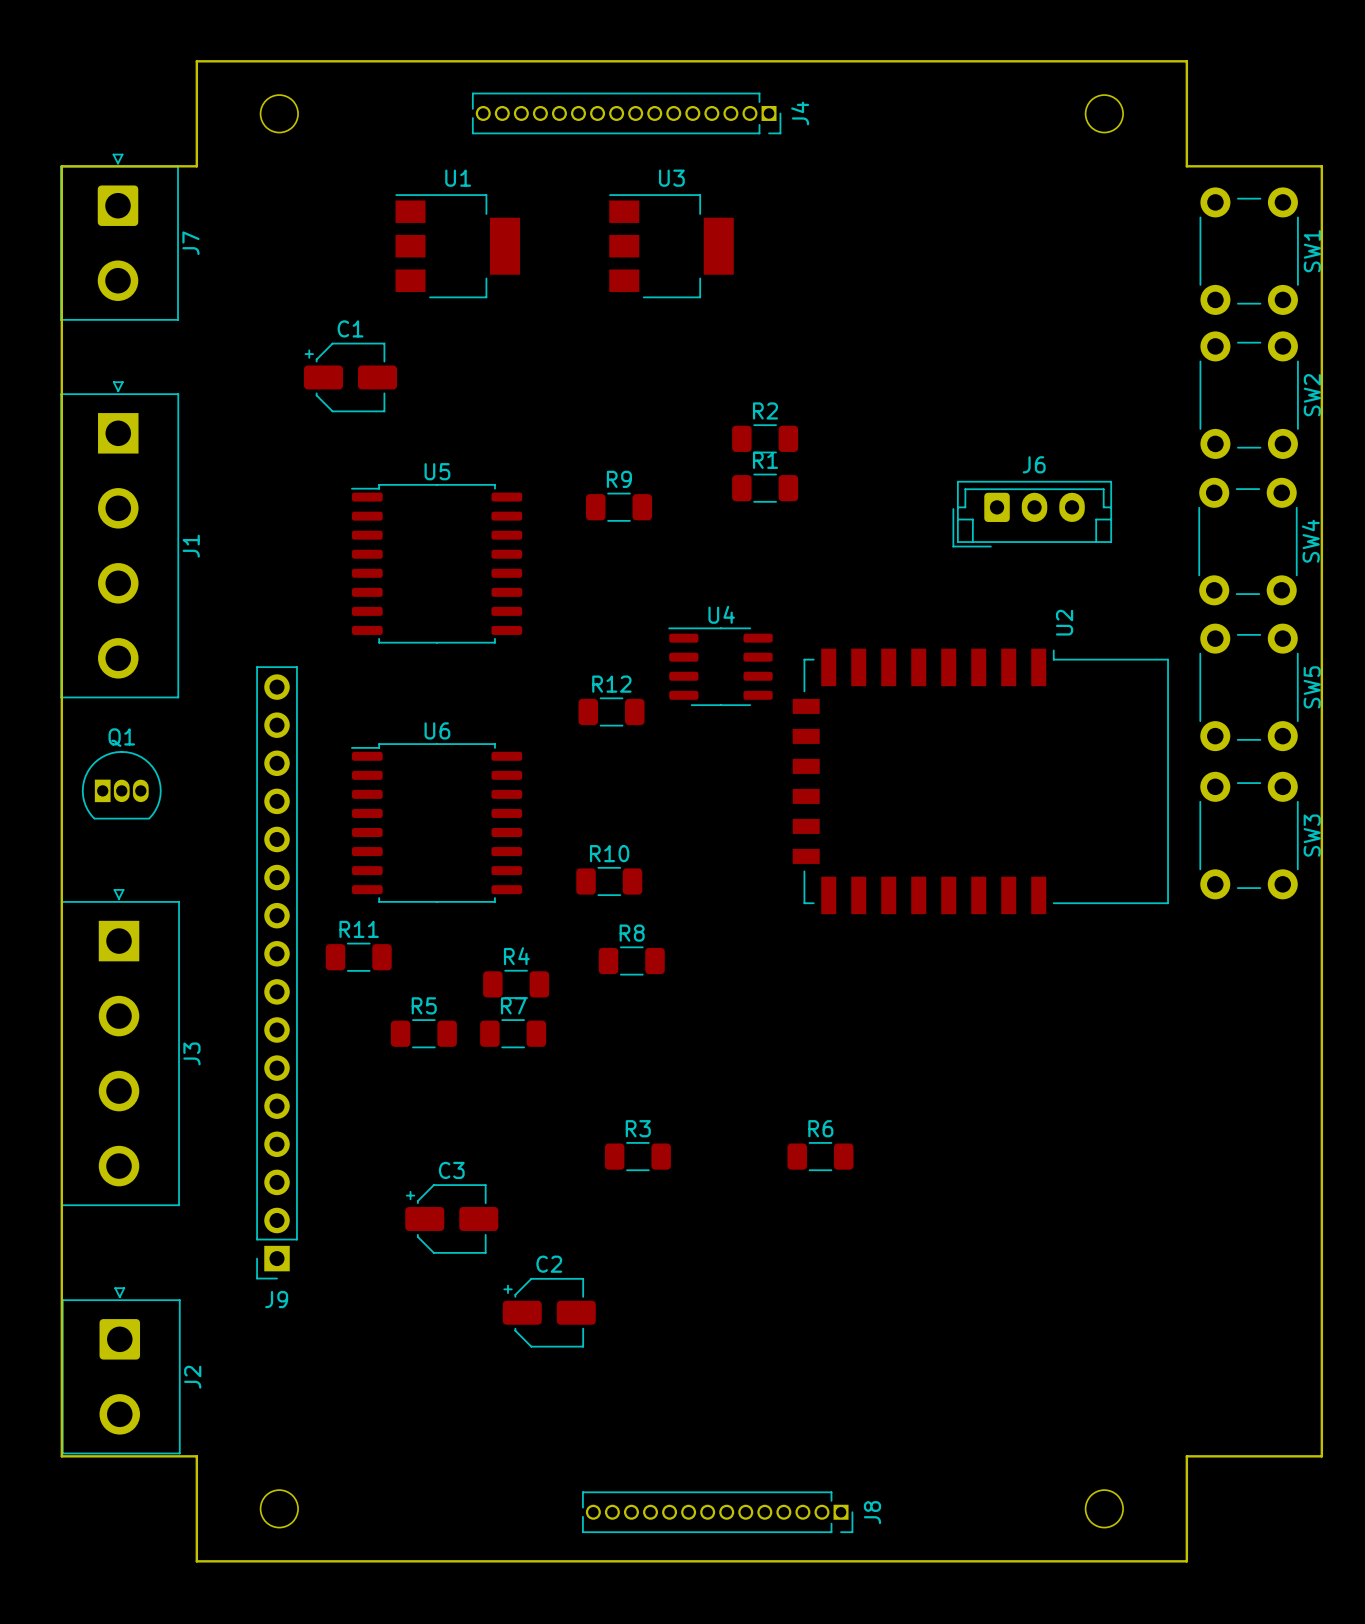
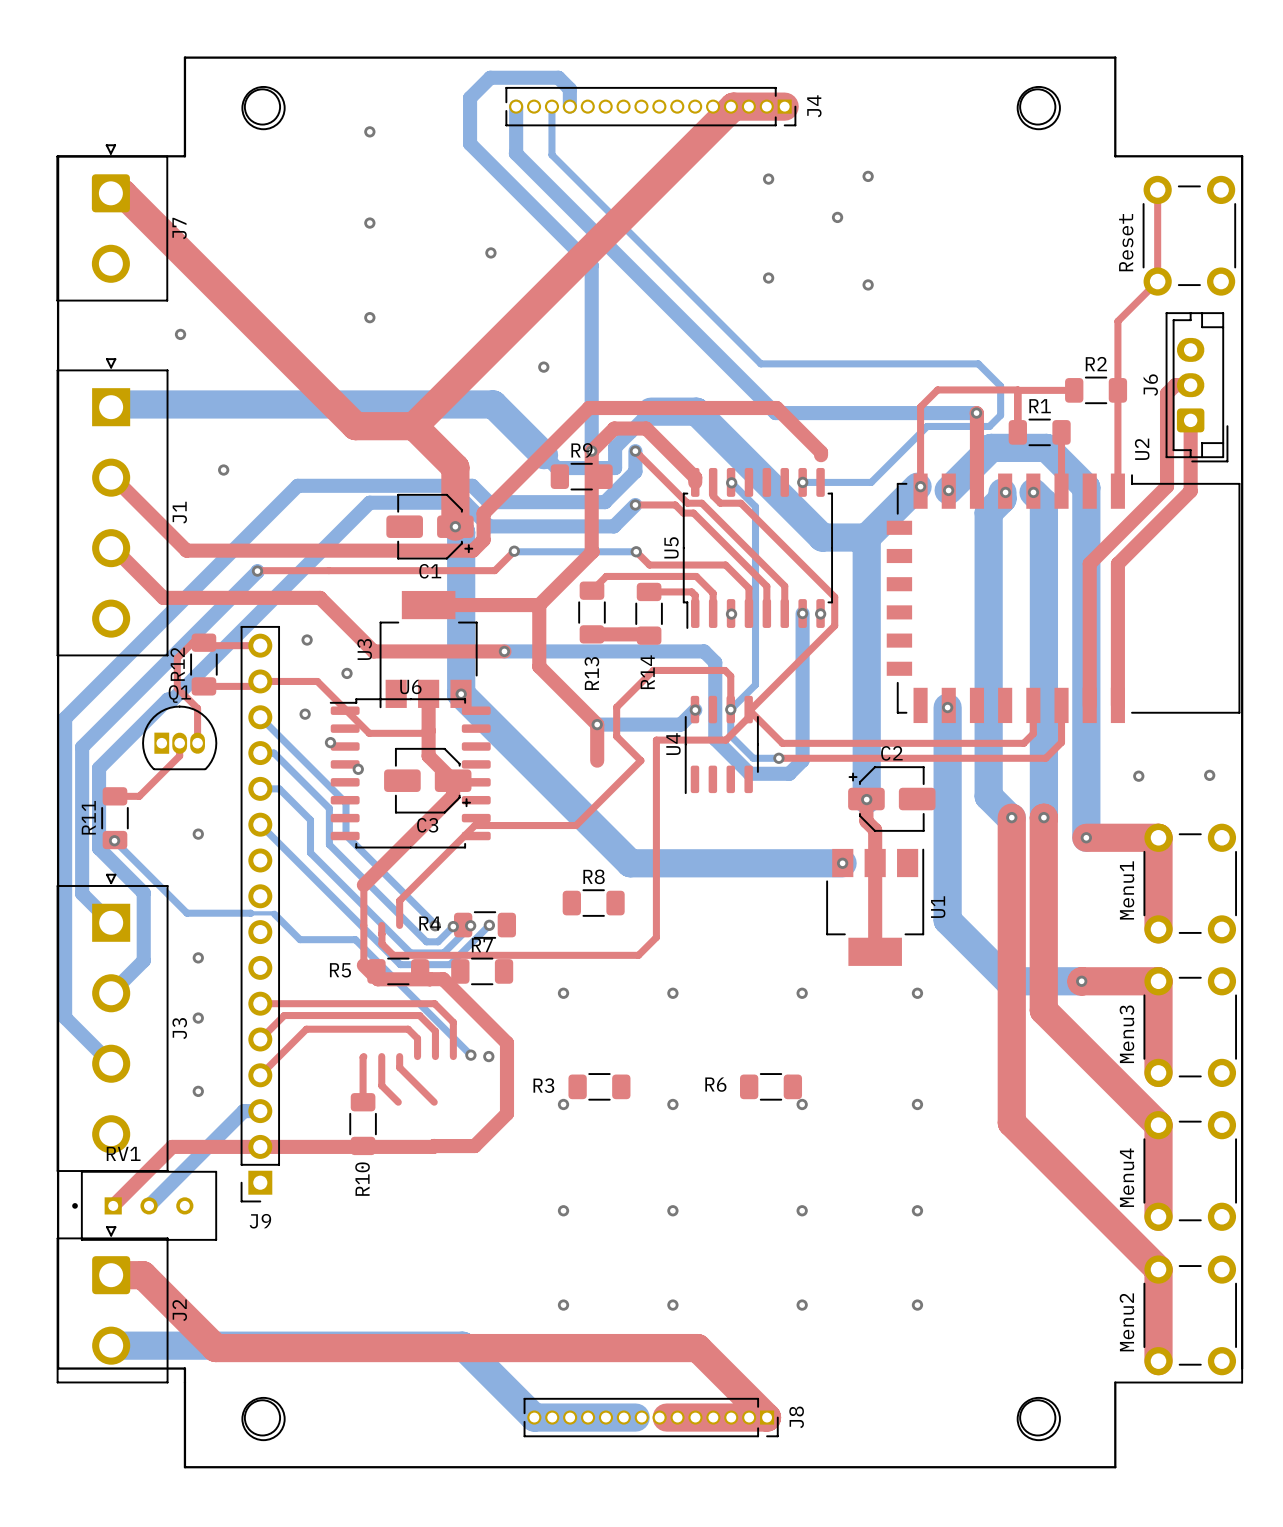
round board edge: none -> [242, 86, 285, 130]
round board edge: none -> [1017, 86, 1060, 130]
bottom track: none -> (516, 106) (515, 153) (775, 413) (976, 413)
bottom track: none -> (551, 106) (551, 154) (760, 363) (978, 363) (1000, 386) (1000, 415) (989, 426) (927, 426) (871, 482) (802, 482)
bottom track: none -> (569, 106) (569, 89) (558, 77) (490, 77) (470, 98) (470, 143) (591, 265) (591, 451)
J4 position: (626, 113) -> (650, 106)
top track: none -> (784, 106) (733, 106) (413, 426)
via: none -> (369, 131)
via: none -> (868, 176)
via: none -> (768, 179)
top track: none -> (1157, 189) (1157, 281) (1117, 321) (1117, 491)
top track: none -> (110, 193) (122, 193) (355, 426) (413, 426)
via: none -> (837, 217)
via: none -> (369, 223)
U1 rotation: 0° (457, 246) -> 90° clockwise (875, 907)
U1 position: (457, 246) -> (875, 907)
U3 rotation: 0° (671, 246) -> 90° counterclockwise (428, 649)
U3 position: (671, 246) -> (428, 649)
part: none -> Reset (1189, 235)
SW1: (1249, 251) -> none
via: none -> (490, 252)
via: none -> (768, 278)
via: none -> (868, 284)
via: none -> (369, 317)
via: none -> (180, 334)
C1 rotation: 0° (350, 377) -> 180° (430, 526)
C1 position: (350, 377) -> (430, 526)
via: none -> (543, 367)
SW2: (1249, 395) -> none
top track: none -> (1190, 385) (1175, 385) (1167, 393) (1167, 486) (1089, 563) (1089, 705)
top track: none -> (1017, 390) (1074, 390)
bottom track: none -> (110, 404) (493, 404) (556, 468) (615, 468) (615, 447) (650, 411) (696, 411) (822, 537) (866, 537)
R2 position: (765, 438) -> (1096, 390)
top track: none -> (976, 413) (976, 491)
via: none -> (976, 413)
top track: none -> (1190, 420) (1190, 491) (1117, 563) (1117, 705)
top track: none -> (413, 426) (455, 467) (455, 526)
top track: none -> (1017, 432) (1017, 389) (937, 389) (920, 407) (920, 491)
top track: none -> (1061, 432) (1061, 491)
via: none -> (591, 451)
top track: none -> (635, 451) (687, 503) (701, 503) (784, 586) (784, 613)
bottom track: none -> (635, 451) (635, 471) (604, 502) (488, 502) (472, 485) (297, 485) (65, 718) (65, 1017) (111, 1063)
via: none -> (635, 451)
top track: none -> (821, 455) (821, 452) (776, 408) (588, 408) (483, 513) (483, 539) (472, 550) (186, 550) (110, 474)
R1 position: (765, 488) -> (1039, 432)
via: none -> (223, 470)
top track: none -> (695, 482) (695, 477) (646, 428) (614, 428) (591, 451) (592, 551) (539, 605)
top track: none -> (713, 482) (713, 496) (720, 503) (740, 503) (834, 597) (834, 625) (750, 709) (748, 709)
bottom track: none -> (731, 482) (755, 506) (755, 684) (730, 709) (730, 735) (753, 758) (778, 758)
via: none -> (731, 482)
via: none -> (802, 482)
J6 rotation: 0° (1032, 514) -> 90° counterclockwise (1196, 387)
J6 position: (1032, 514) -> (1196, 387)
bottom track: none -> (917, 486) (866, 537)
via: none -> (920, 486)
bottom track: none -> (948, 490) (991, 447) (1046, 447) (1086, 487) (1086, 837)
via: none -> (948, 490)
bottom track: none -> (1002, 492) (1002, 498) (988, 512) (988, 796) (1011, 817)
via: none -> (1005, 492)
bottom track: none -> (1033, 492) (1043, 502) (1043, 817)
via: none -> (1033, 492)
top track: none -> (635, 504) (675, 504) (683, 513) (693, 513) (766, 586) (766, 613)
bottom track: none -> (635, 504) (613, 526) (489, 526) (465, 502) (369, 502) (172, 699) (167, 699) (99, 768) (99, 848) (143, 893) (143, 960) (111, 993)
via: none -> (635, 504)
SW4: (1247, 541) -> none
bottom track: none -> (455, 526) (461, 532) (461, 694) (630, 863) (842, 863)
via: none -> (455, 526)
U5 rotation: 0° (436, 563) -> 90° counterclockwise (757, 548)
U5 position: (436, 563) -> (757, 548)
bottom track: none -> (866, 537) (866, 799)
top track: none -> (110, 545) (163, 597) (320, 597) (373, 651) (504, 651)
top track: none -> (514, 551) (494, 570) (257, 571)
bottom track: none -> (514, 551) (636, 551)
via: none -> (514, 551)
top track: none -> (636, 551) (649, 565) (725, 565) (748, 588) (748, 613)
via: none -> (636, 551)
bottom track: none -> (257, 571) (82, 747) (82, 893) (111, 922)
via: none -> (257, 571)
top track: none -> (591, 590) (606, 576) (696, 576) (713, 593) (713, 613)
top track: none -> (649, 591) (691, 591) (695, 595) (695, 613)
top track: none -> (428, 605) (539, 605)
top track: none -> (539, 605) (539, 666) (597, 724) (597, 760)
R13: none -> (591, 612)
bottom track: none -> (802, 613) (802, 760) (789, 773) (749, 773) (715, 739) (715, 662) (704, 651) (504, 651)
via: none -> (802, 613)
R14: none -> (649, 613)
via: none -> (731, 614)
via: none -> (820, 613)
U4 rotation: 0° (720, 666) -> 90° counterclockwise (721, 744)
U4 position: (720, 666) -> (721, 744)
top track: none -> (591, 634) (649, 635)
via: none -> (307, 640)
R12 name position: R12 (611, 684) -> R12 (177, 664)
top track: none -> (260, 645) (206, 645) (203, 642) (192, 642) (177, 658) (177, 688) (197, 708) (197, 743)
SW5: (1249, 687) -> none
via: none -> (504, 651)
R12 rotation: 0° (611, 711) -> 90° clockwise (203, 664)
R12 position: (611, 711) -> (203, 664)
via: none -> (347, 673)
top track: none -> (203, 686) (255, 686) (260, 681) (317, 681) (369, 733) (426, 733) (428, 730)
top track: none -> (428, 693) (428, 756) (453, 780) (453, 795) (363, 885) (363, 965) (377, 979) (429, 979)
via: none -> (461, 694)
top track: none -> (1033, 705) (1033, 733) (1023, 743) (782, 743) (748, 709)
top track: none -> (1061, 705) (1061, 742) (1045, 758) (778, 758)
bottom track: none -> (947, 707) (947, 920) (1008, 981) (1081, 981)
via: none -> (947, 707)
bottom track: none -> (695, 710) (680, 724) (597, 724)
via: none -> (695, 710)
top track: none -> (730, 709) (730, 676) (725, 670) (653, 670) (616, 707) (616, 736) (640, 760) (576, 825) (474, 825) (399, 900) (399, 925)
via: none -> (730, 709)
top track: none -> (748, 709) (748, 717) (725, 740) (656, 740) (656, 937) (638, 955) (393, 955) (381, 943) (381, 925)
via: none -> (305, 714)
bottom track: none -> (260, 717) (346, 802) (346, 835) (435, 925)
via: none -> (597, 724)
U2 position: (980, 781) -> (1063, 598)
Q1 position: (121, 785) -> (179, 737)
top track: none -> (179, 743) (179, 755) (139, 796) (114, 796)
via: none -> (330, 742)
bottom track: none -> (260, 753) (273, 753) (329, 808) (329, 844) (426, 941) (438, 941) (453, 926)
via: none -> (778, 758)
via: none -> (358, 769)
via: none -> (1138, 776)
via: none -> (1209, 775)
SW3: (1249, 835) -> none
bottom track: none -> (260, 788) (279, 788) (310, 820) (310, 852) (410, 952) (443, 952) (470, 925)
top track: none -> (866, 799) (866, 821) (875, 830) (875, 951)
via: none -> (866, 799)
R10 name position: R10 (609, 853) -> R10 (362, 1179)
top track: none -> (1011, 817) (1011, 1122) (1158, 1269) (1158, 1361)
via: none -> (1011, 817)
top track: none -> (1043, 817) (1043, 1010) (1158, 1125) (1158, 1216)
via: none -> (1043, 817)
bottom track: none -> (260, 824) (400, 964) (450, 964) (489, 925)
R10 rotation: 0° (609, 881) -> 90° clockwise (363, 1124)
R10 position: (609, 881) -> (363, 1124)
via: none -> (198, 834)
top track: none -> (1086, 837) (1158, 837) (1158, 929)
via: none -> (1086, 837)
bottom track: none -> (114, 840) (187, 913) (250, 913)
via: none -> (114, 840)
via: none -> (842, 863)
R11 name position: R11 (359, 929) -> R11 (88, 817)
part: none -> Menu1 (1190, 883)
R4 name position: R4 (516, 956) -> R4 (430, 923)
R11 rotation: 0° (358, 957) -> 90° clockwise (114, 818)
R11 position: (358, 957) -> (114, 818)
bottom track: none -> (250, 913) (273, 913) (300, 939) (355, 939) (470, 1055)
via: none -> (489, 925)
via: none -> (435, 925)
via: none -> (470, 925)
via: none -> (453, 926)
R5 name position: R5 (424, 1005) -> R5 (340, 970)
via: none -> (198, 957)
top track: none -> (429, 979) (443, 979) (506, 1042) (506, 1113) (474, 1146) (434, 1146)
top track: none -> (1081, 981) (1158, 981) (1158, 1072)
via: none -> (1081, 981)
J3 position: (120, 1047) -> (112, 1022)
via: none -> (563, 993)
via: none -> (672, 993)
via: none -> (802, 993)
via: none -> (917, 993)
top track: none -> (260, 1003) (434, 1003) (453, 1022) (453, 1056)
via: none -> (198, 1018)
part: none -> Menu3 (1190, 1027)
top track: none -> (260, 1039) (284, 1015) (419, 1015) (435, 1031) (435, 1056)
via: none -> (470, 1055)
top track: none -> (363, 1056) (363, 1102)
top track: none -> (381, 1056) (381, 1085) (398, 1102)
top track: none -> (399, 1056) (399, 1067) (434, 1102)
top track: none -> (417, 1056) (417, 1038) (408, 1029) (306, 1029) (260, 1075)
via: none -> (488, 1056)
R3 name position: R3 (638, 1128) -> R3 (543, 1085)
R6 name position: R6 (820, 1128) -> R6 (715, 1084)
via: none -> (198, 1091)
via: none -> (563, 1104)
via: none -> (672, 1104)
via: none -> (802, 1104)
via: none -> (917, 1104)
bottom track: none -> (260, 1111) (243, 1111) (149, 1205)
C3 rotation: 0° (451, 1218) -> 180° (427, 780)
C3 position: (451, 1218) -> (427, 780)
top track: none -> (434, 1145) (172, 1146) (113, 1205)
part: none -> Menu4 (1190, 1170)
RV1: none -> (144, 1205)
via: none -> (563, 1210)
via: none -> (672, 1210)
via: none -> (802, 1210)
via: none -> (917, 1210)
C2 position: (549, 1312) -> (891, 799)
top track: none -> (111, 1275) (142, 1275) (215, 1348) (697, 1348) (767, 1417) (666, 1417)
J2 position: (121, 1370) -> (112, 1304)
via: none -> (563, 1305)
via: none -> (672, 1305)
via: none -> (802, 1305)
via: none -> (917, 1305)
part: none -> Menu2 (1190, 1315)
bottom track: none -> (111, 1345) (462, 1345) (534, 1417) (635, 1417)
board edge: (1321, 1456) (1186, 1456) (1186, 1471) -> (1242, 1368) (1242, 1382) (1115, 1382)
round board edge: none -> [242, 1397, 285, 1441]
round board edge: none -> [1017, 1397, 1060, 1441]
J8 position: (717, 1512) -> (651, 1417)

